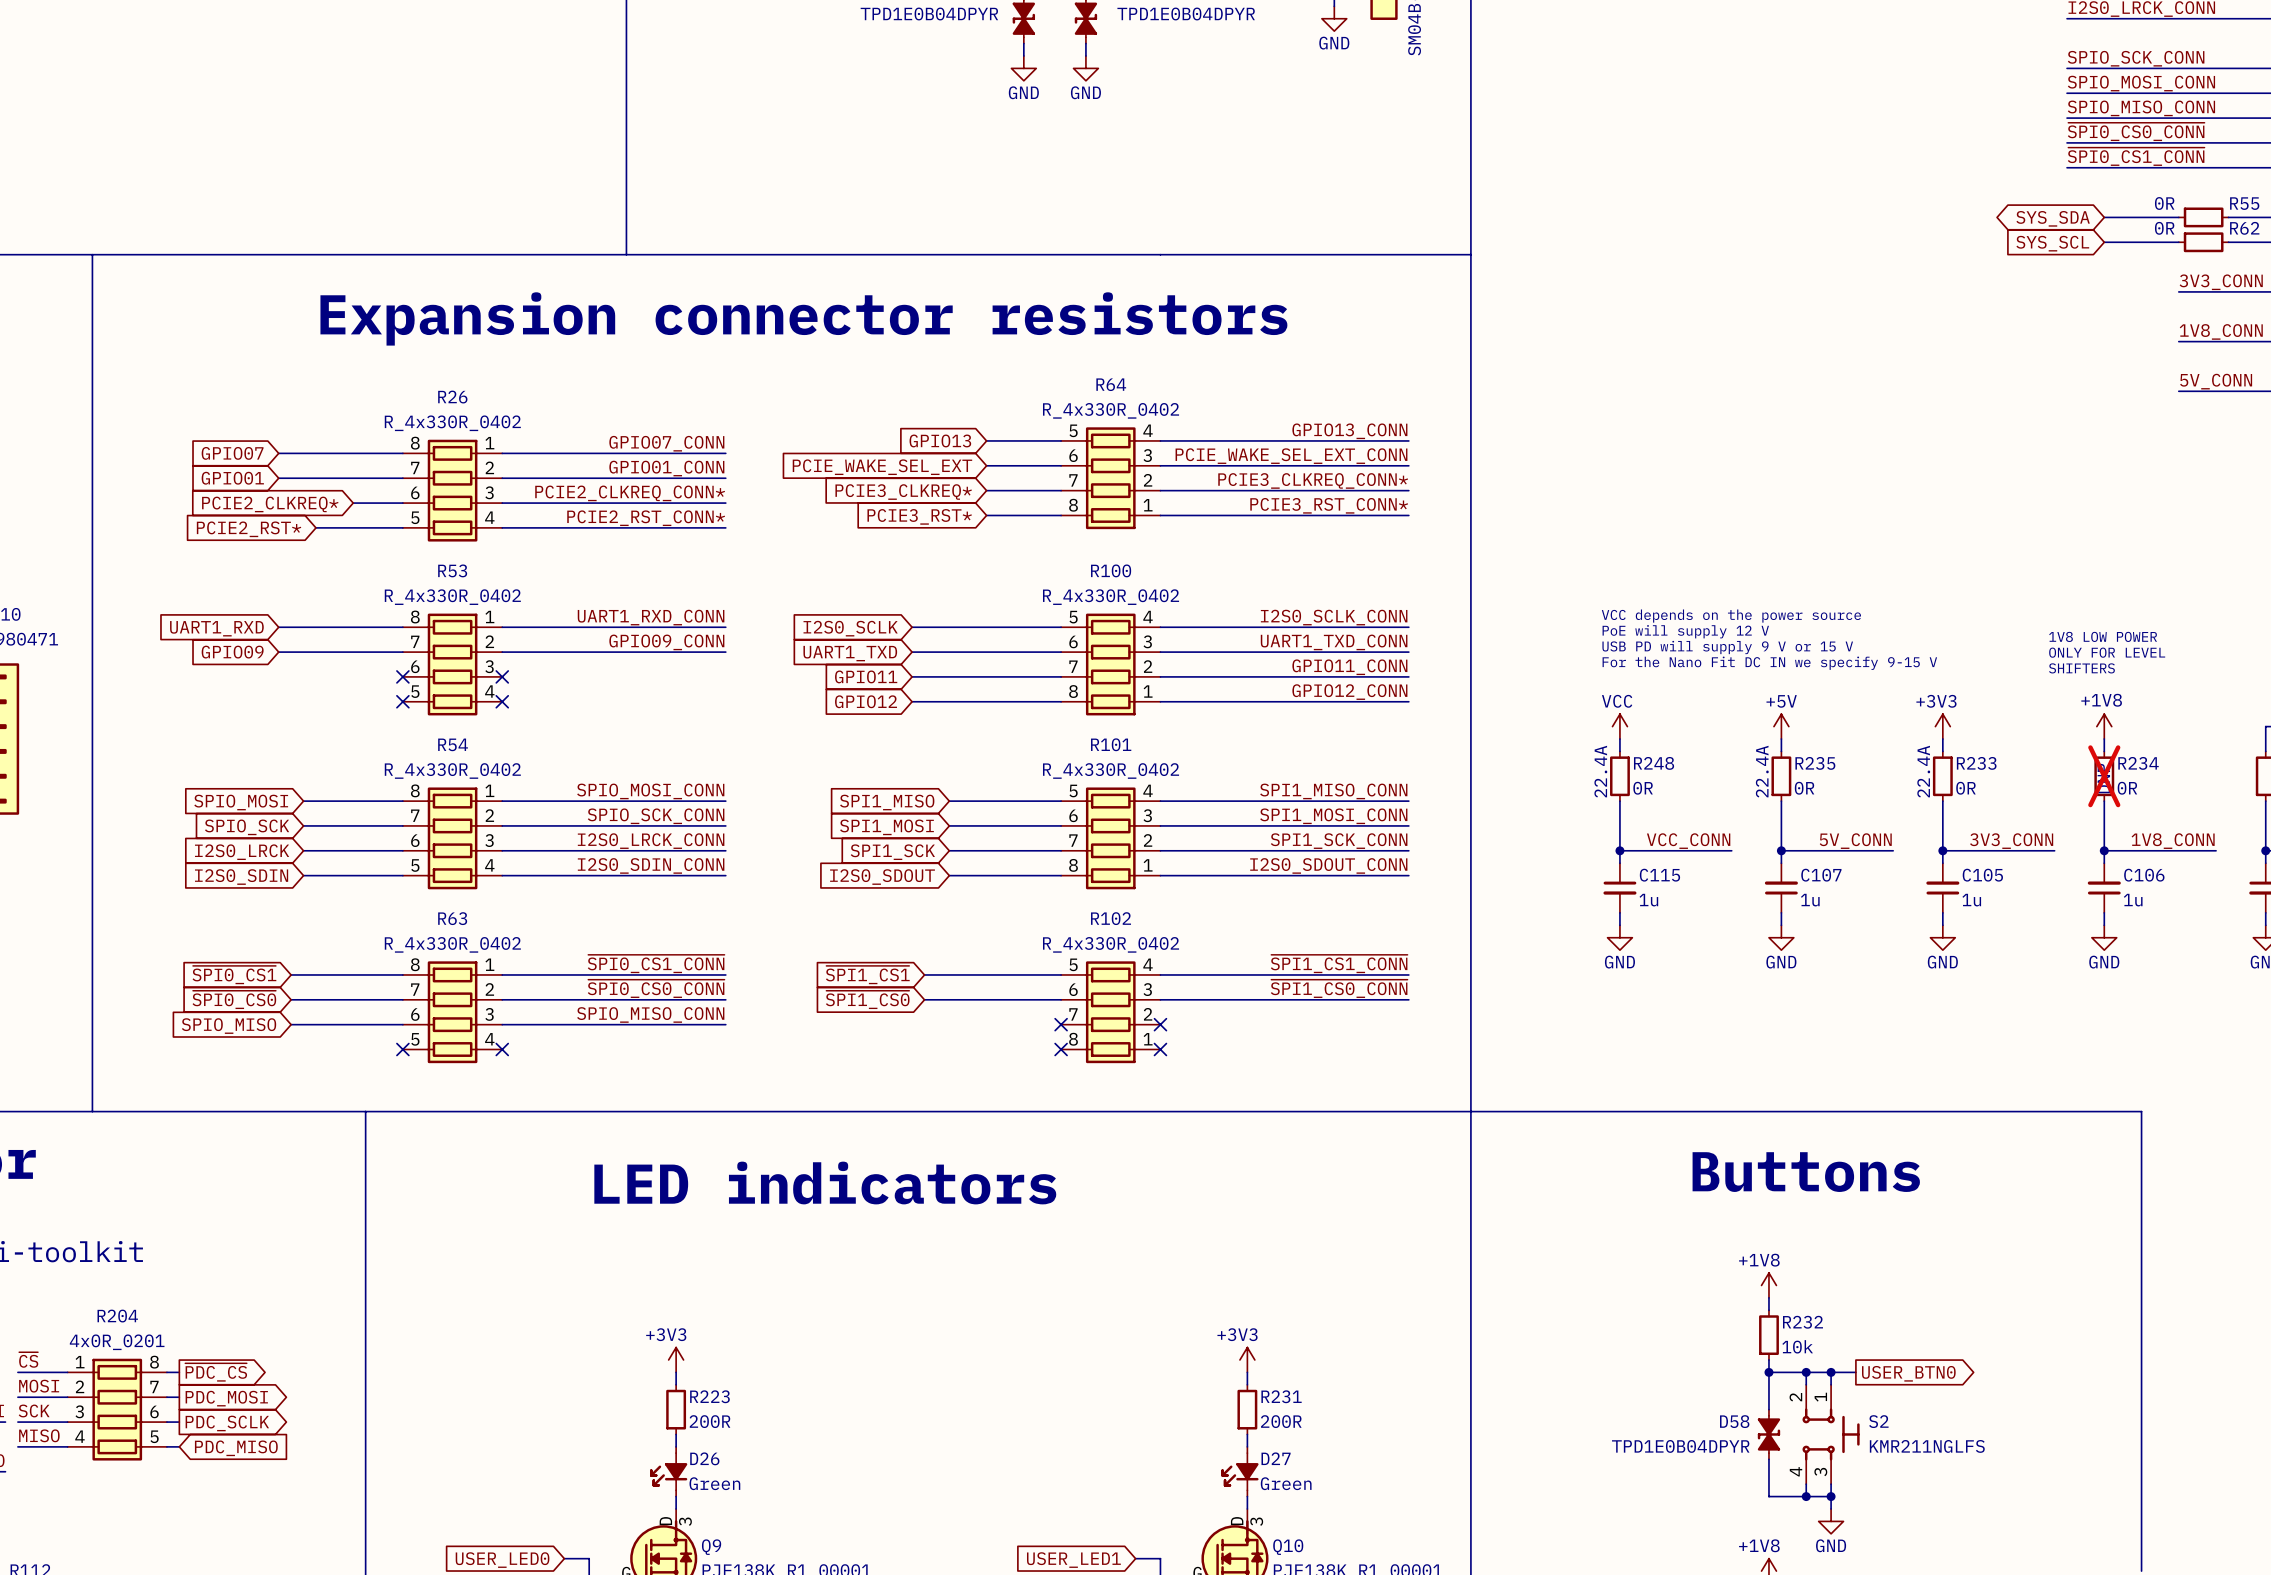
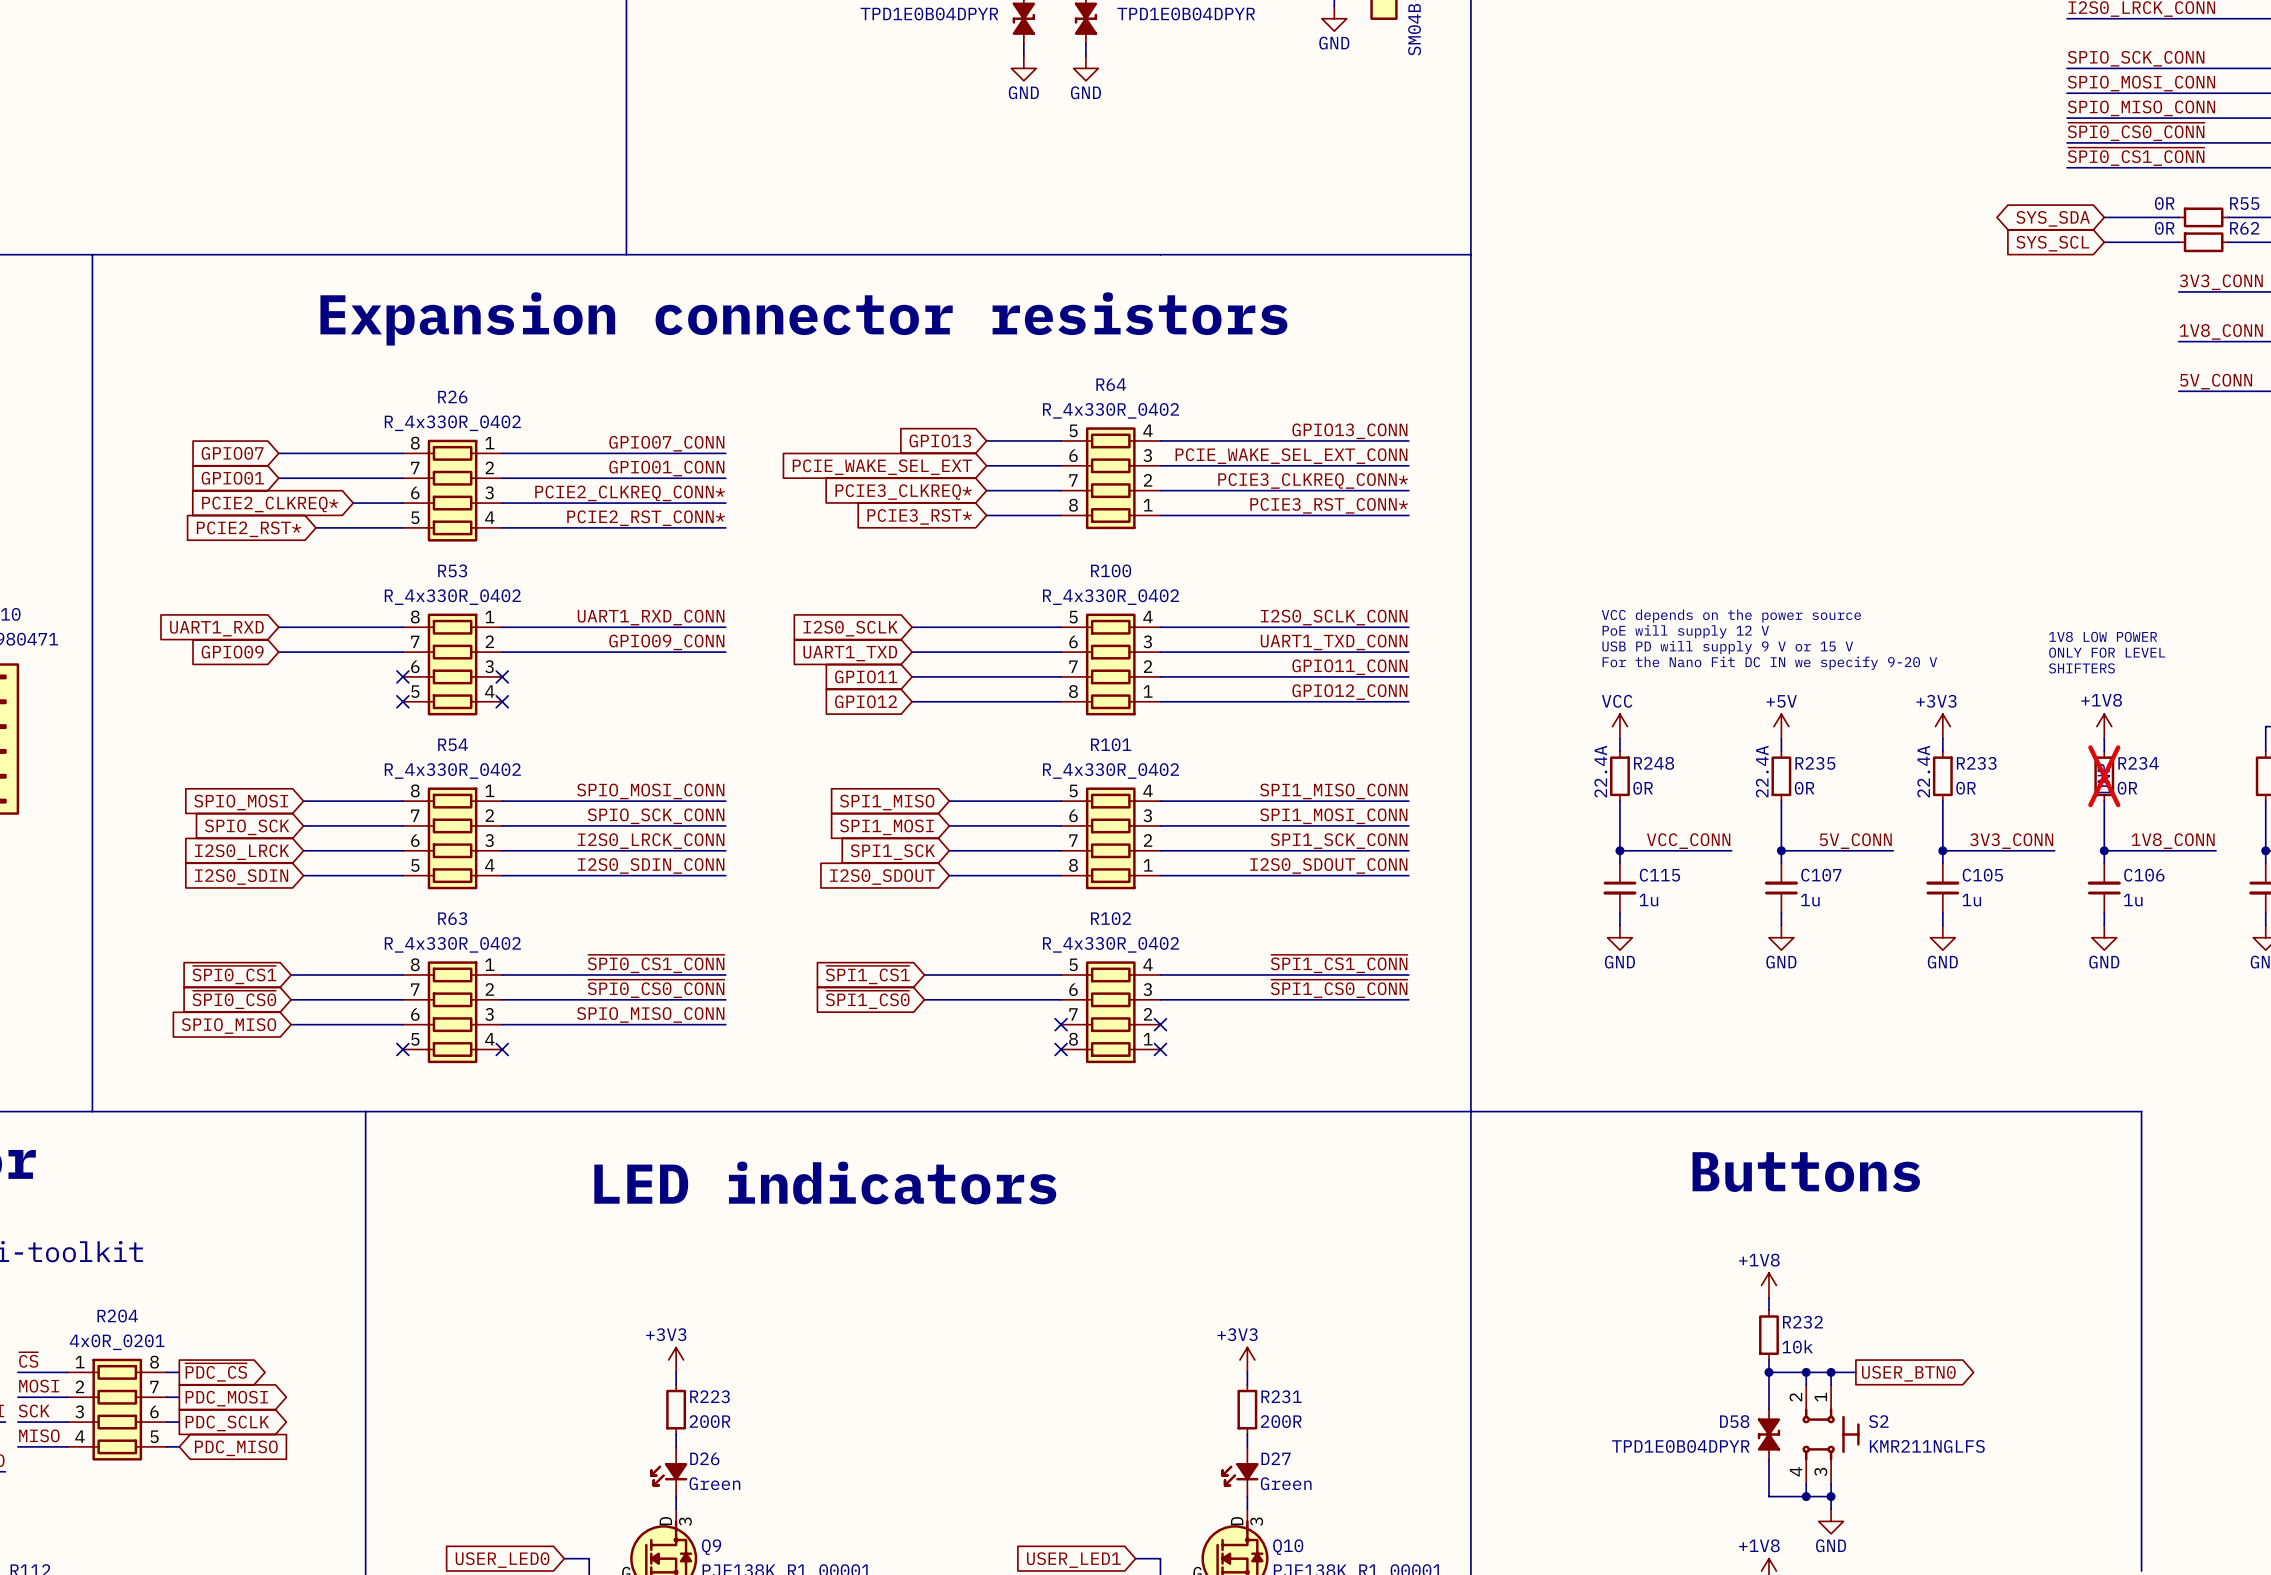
text: For the Nano Fit DC IN we specify 9-15 V (1769, 663) -> For the Nano Fit DC IN we specify 9-20 V (1769, 663)

